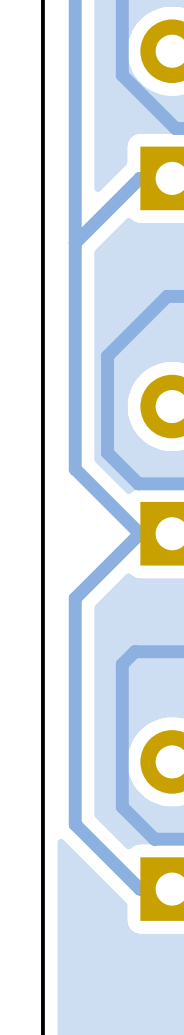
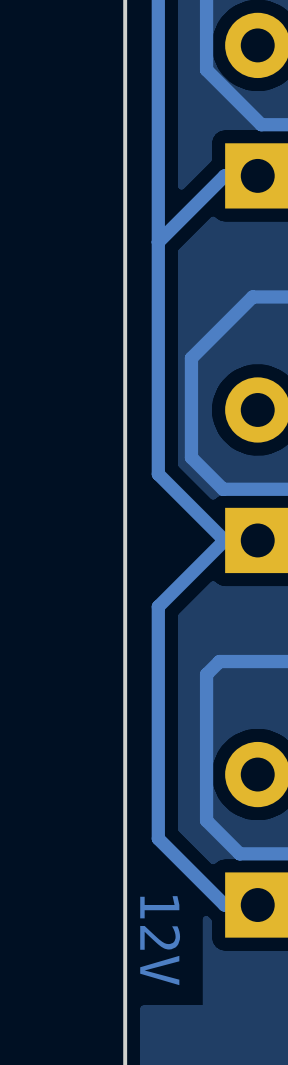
text: none -> 12V (160, 940)

